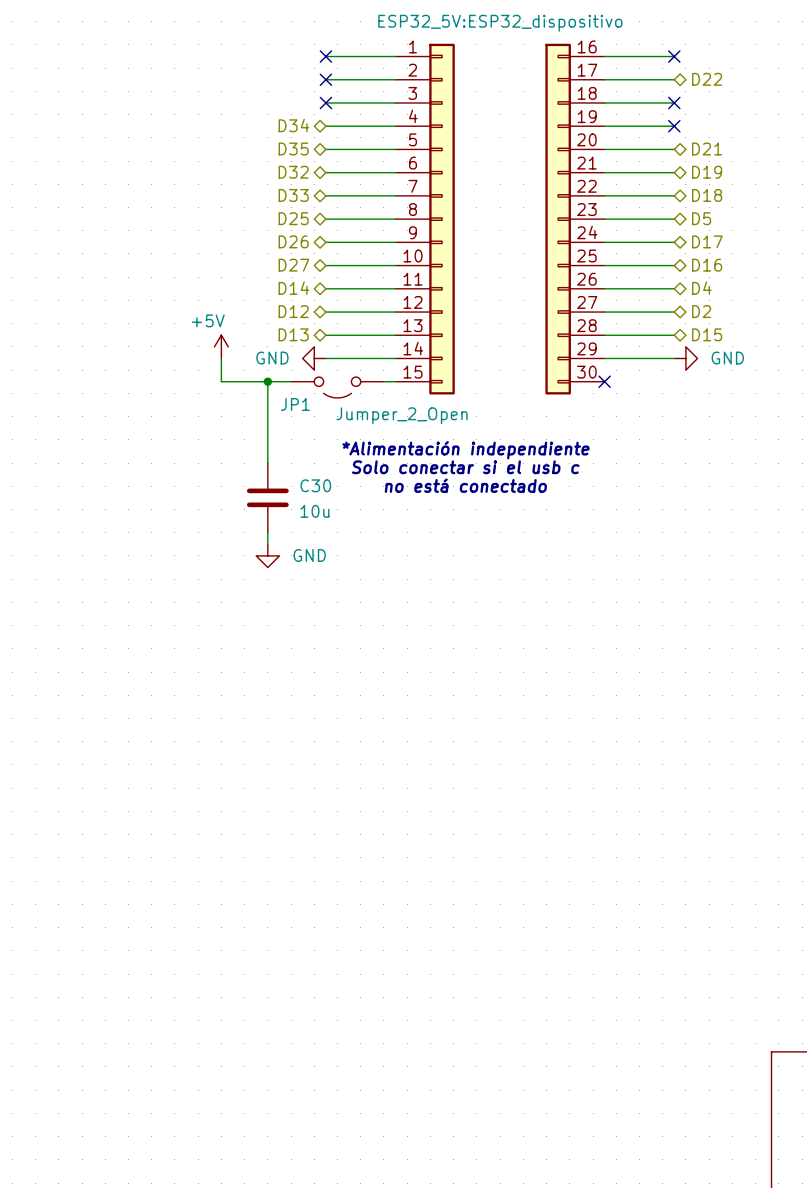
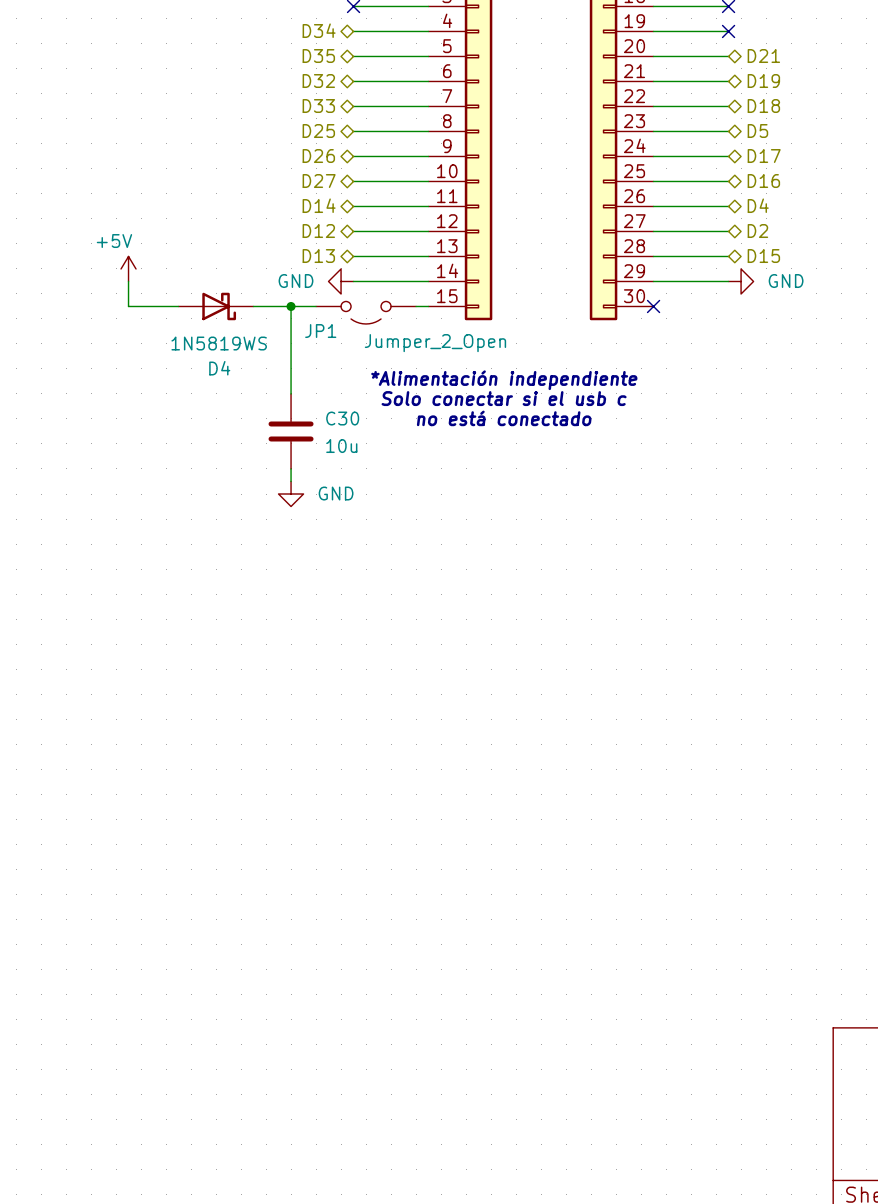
power symbol position: +5V (221, 346) -> +5V (128, 268)
wire: none -> (128, 281) (128, 306) (178, 306)
wire: (221, 358) (221, 381) (232, 381) -> none
D4: none -> 1N5819WS (216, 306)

